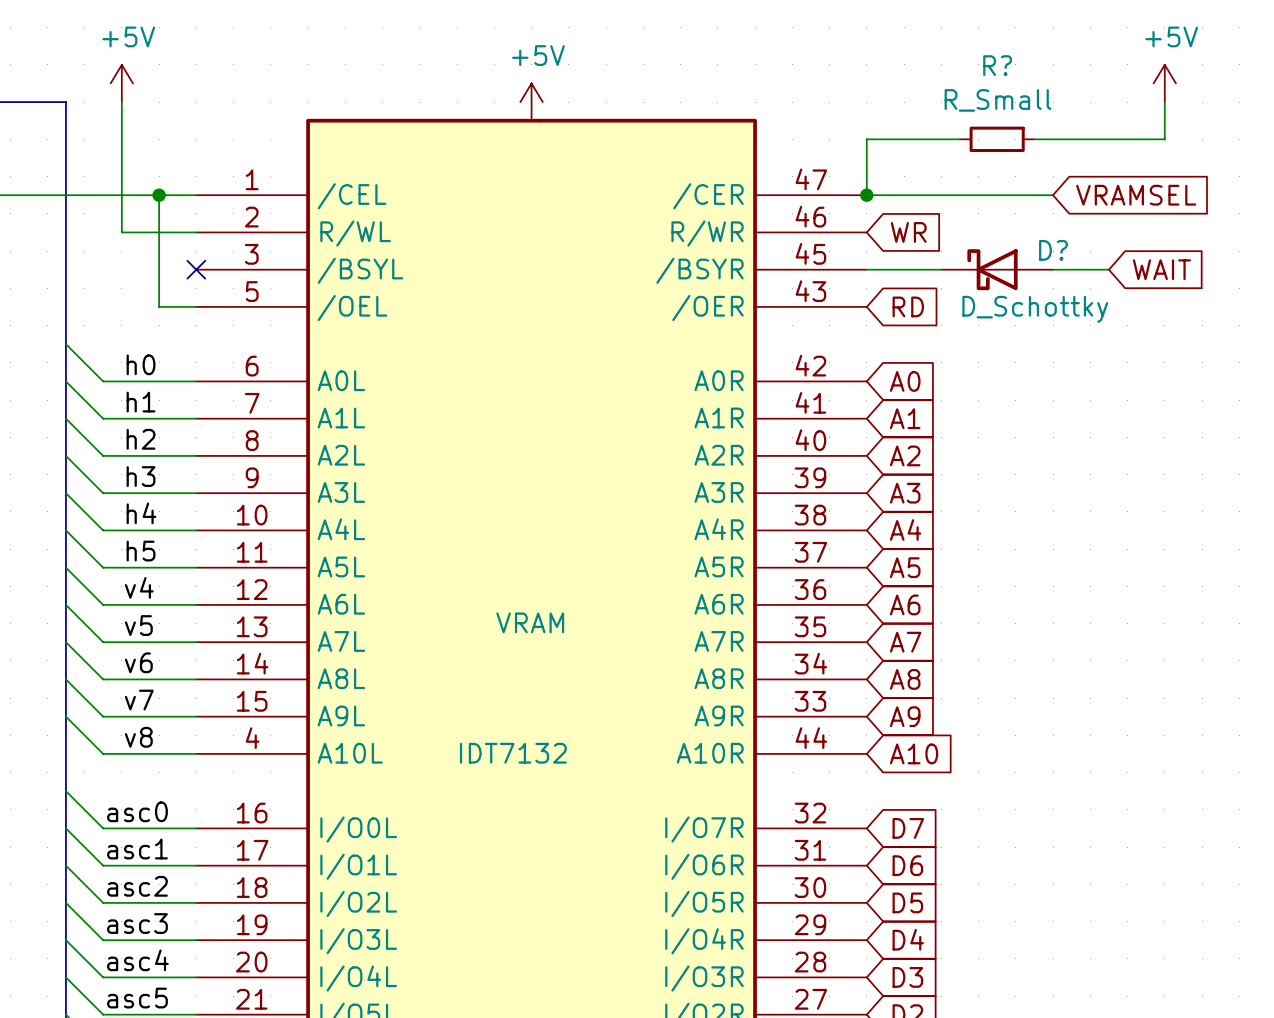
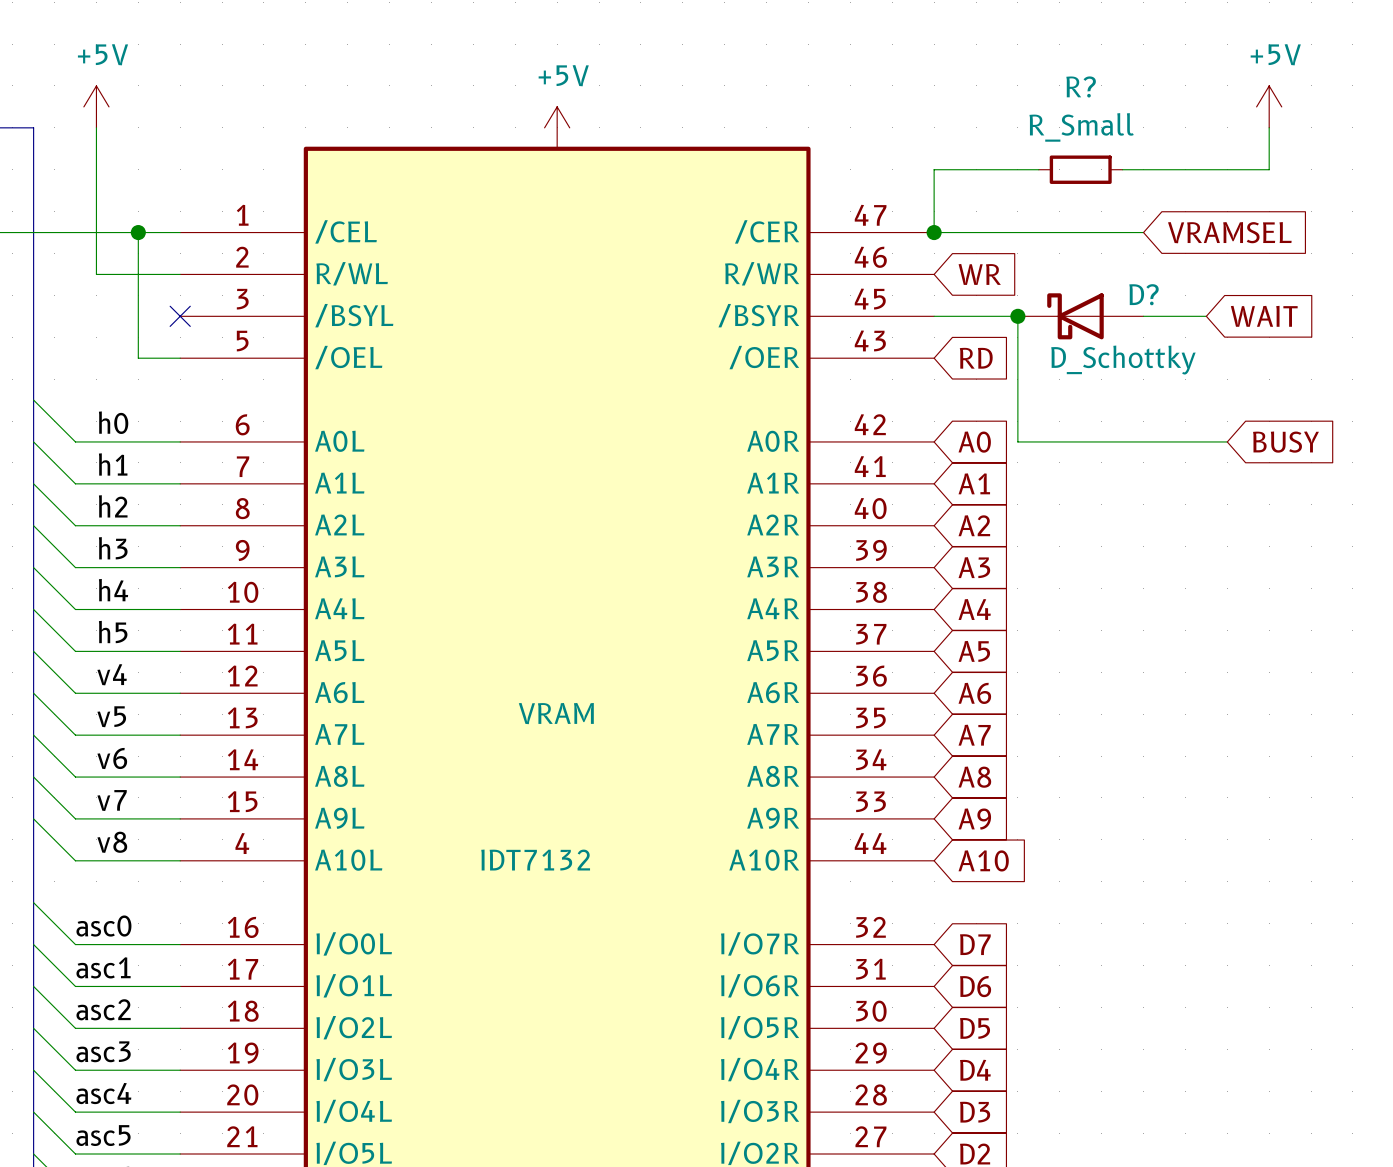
wire: none -> (1017, 316) (1017, 441) (1227, 441)
junction: none -> (1017, 316)
global label: none -> BUSY (1286, 442)

